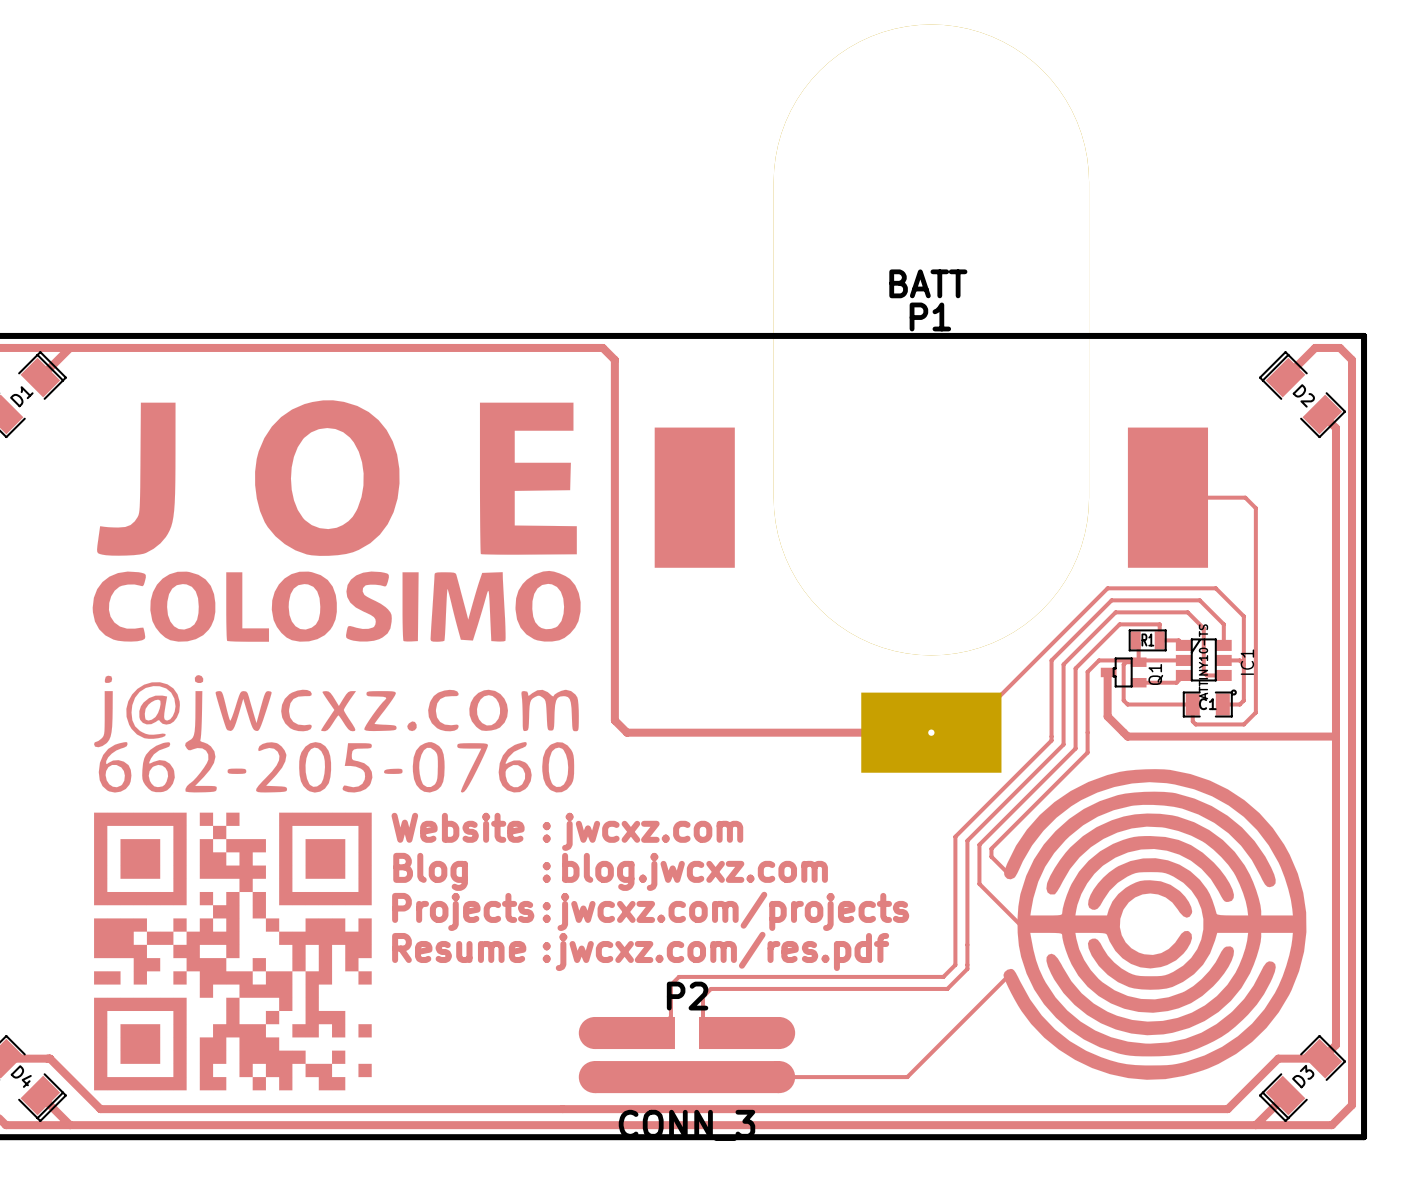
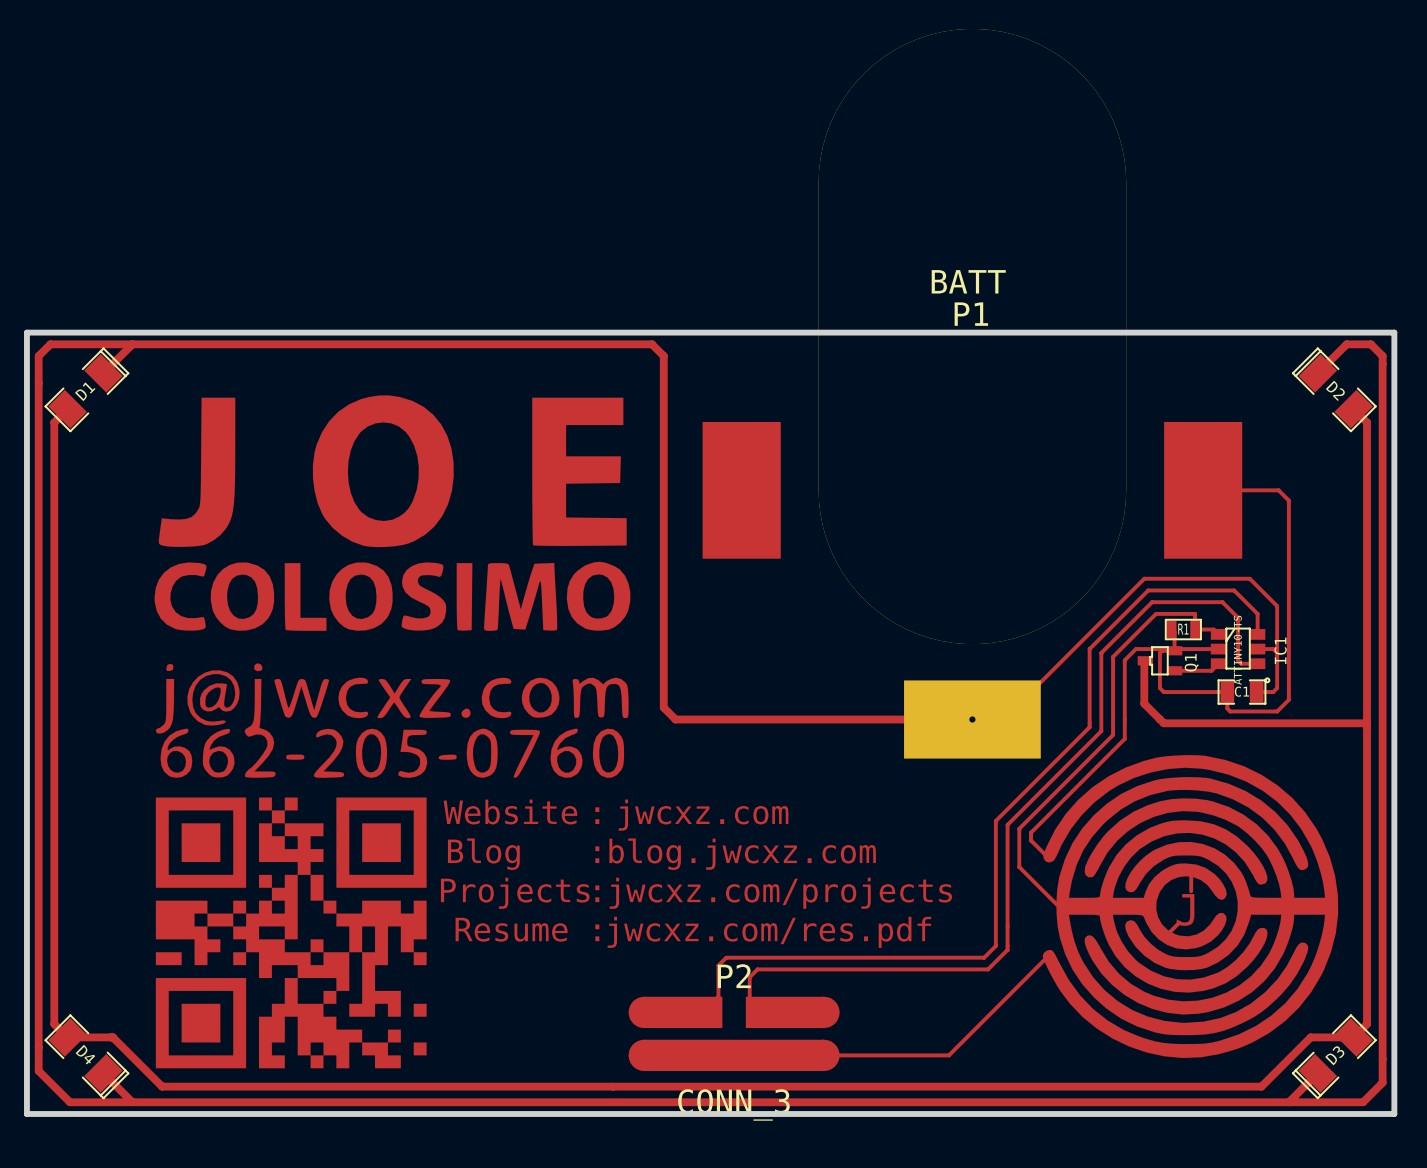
track: none -> (1191, 875) (1191, 891)
text: none -> J (1185, 909)
track: none -> (1179, 922) (1167, 934)

